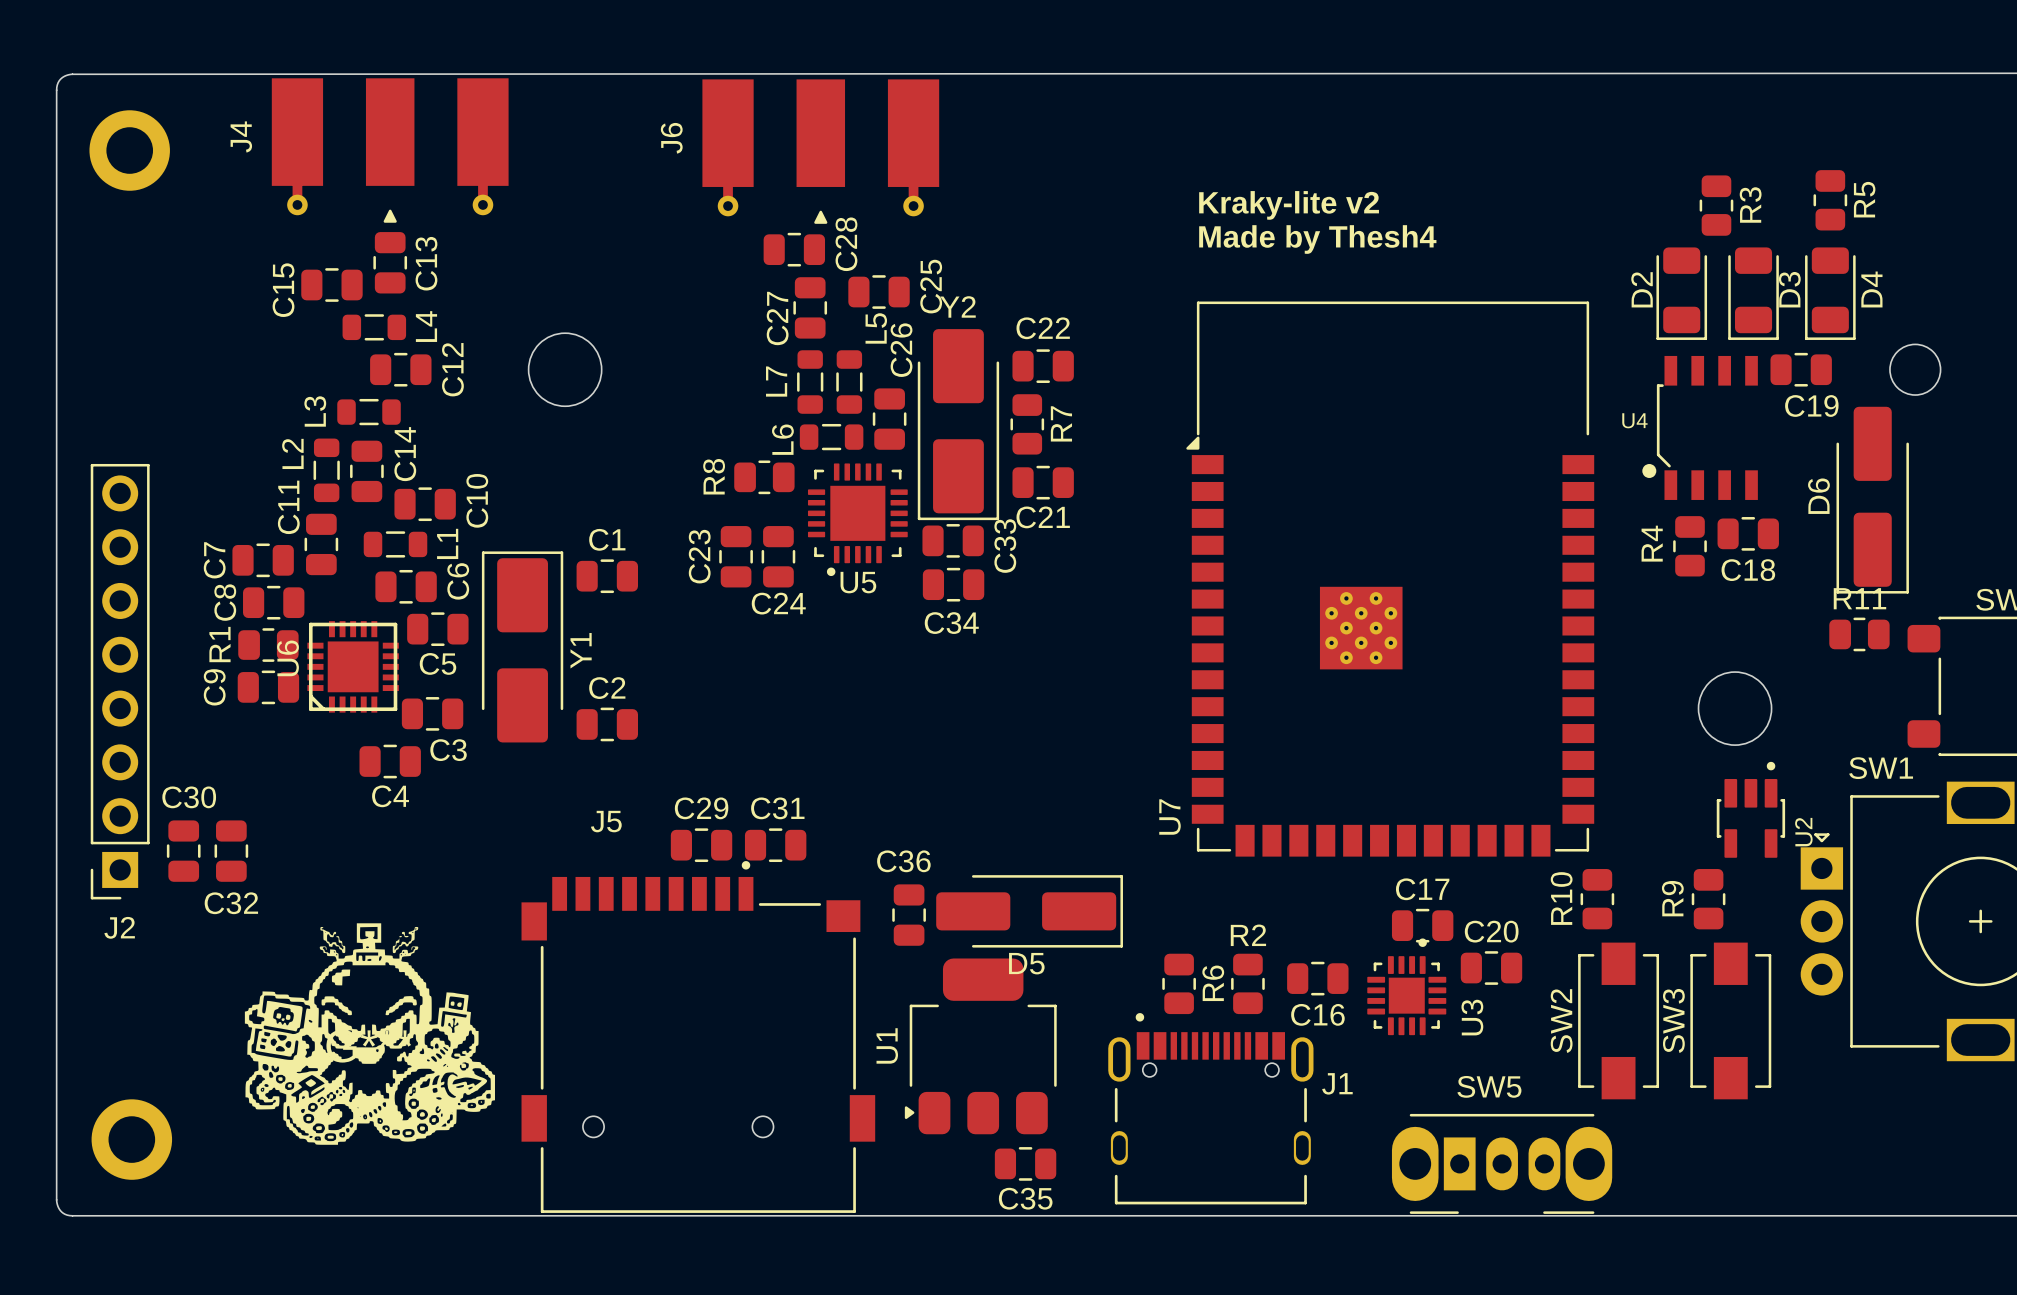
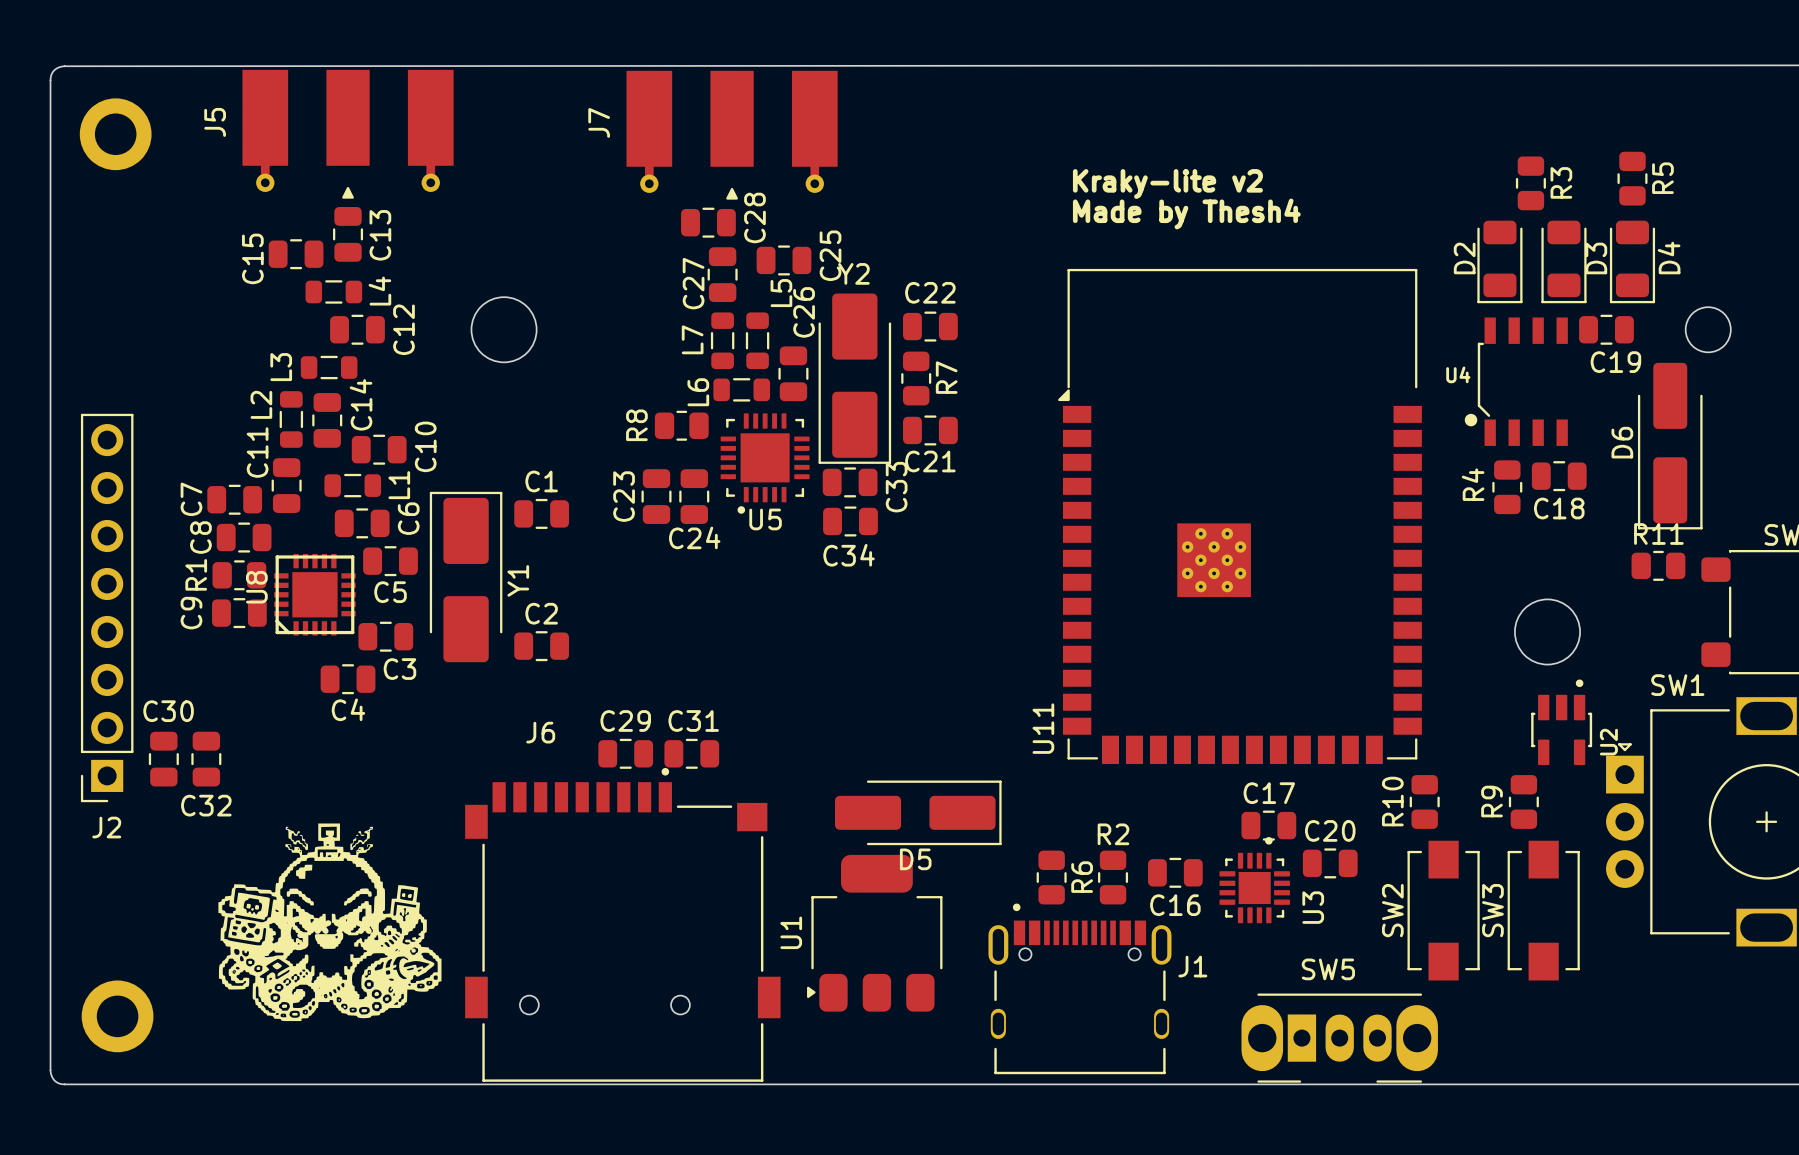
J4 name: J4 (241, 136) -> J5 (215, 122)
J6 name: J6 (671, 138) -> J7 (599, 122)
U6 name: U6 (288, 658) -> U8 (256, 587)
U7 name: U7 (1169, 817) -> U11 (1043, 728)
J5 name: J5 (606, 821) -> J6 (540, 732)
C36: (909, 915) -> none
C35: (1025, 1163) -> none

